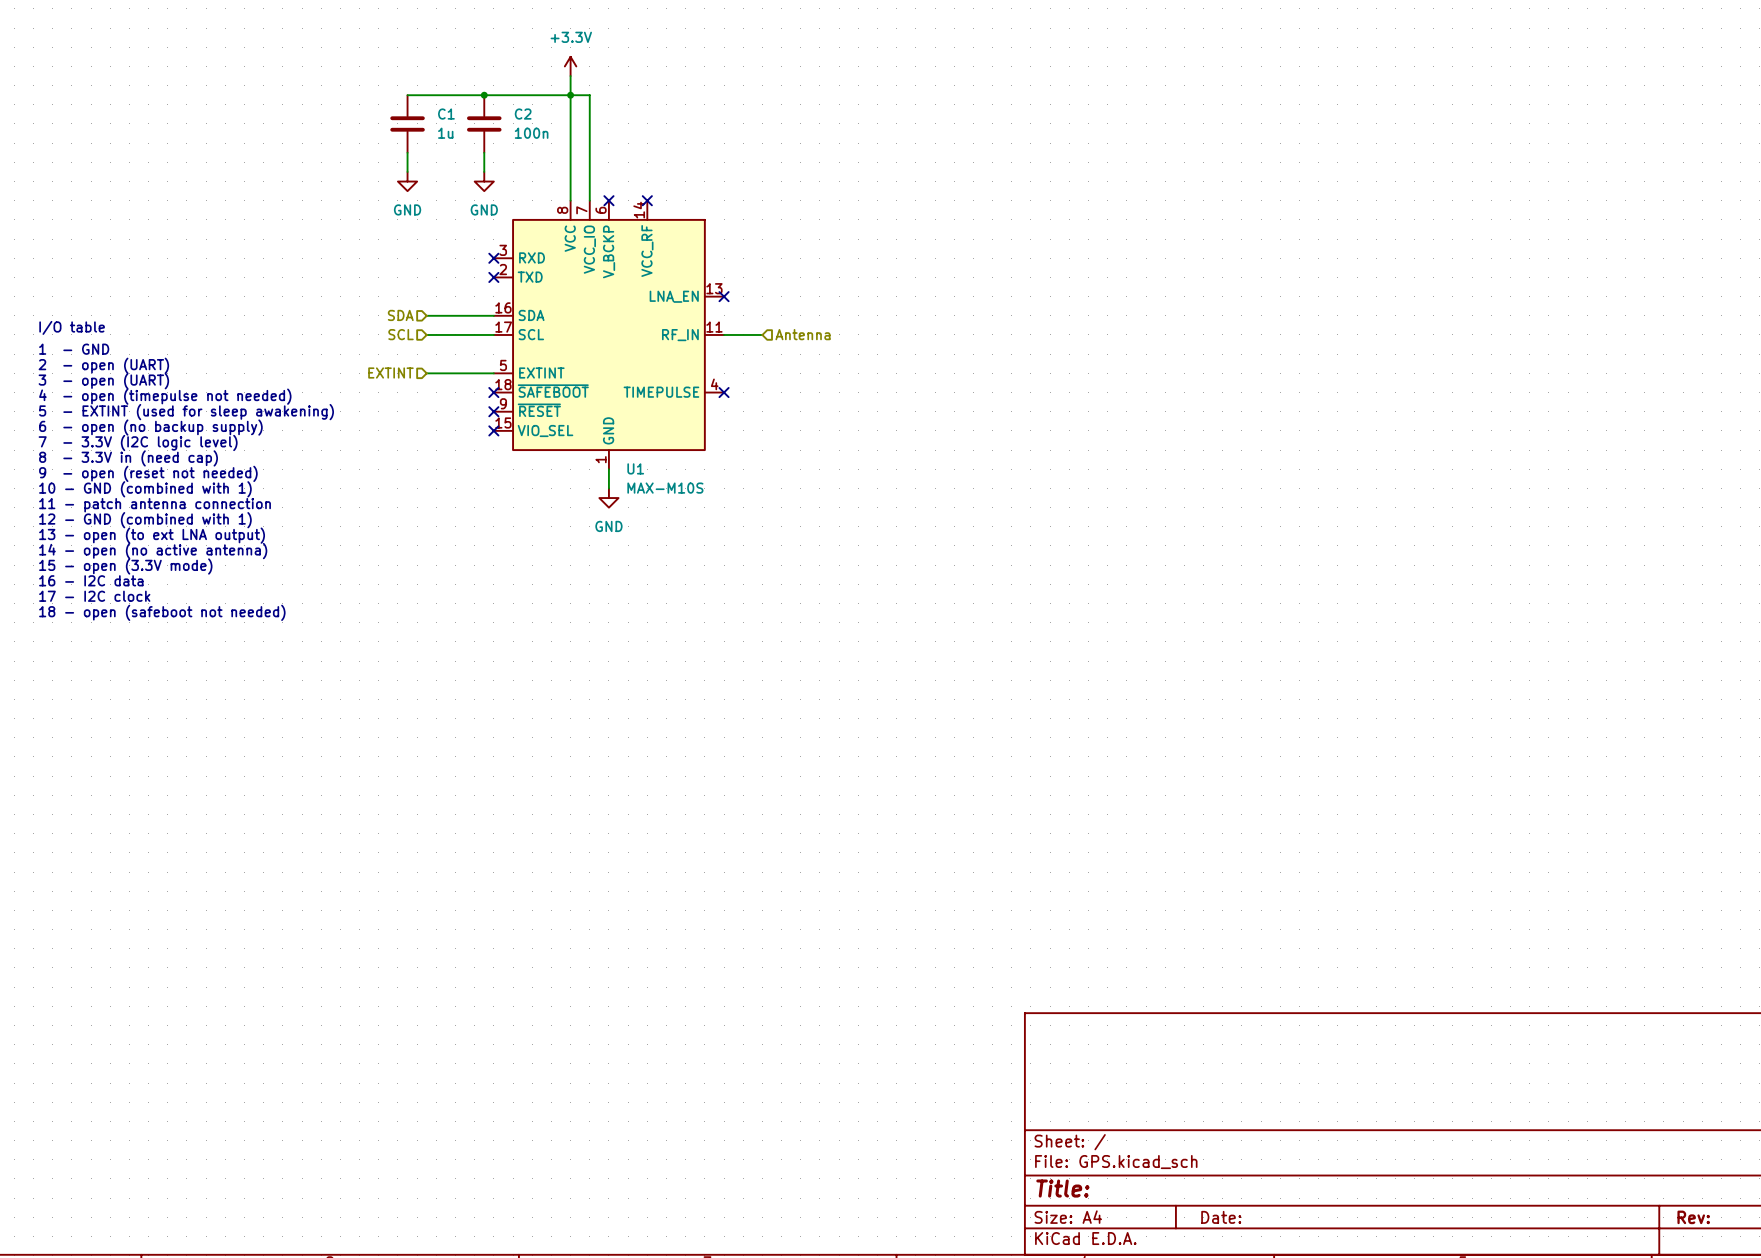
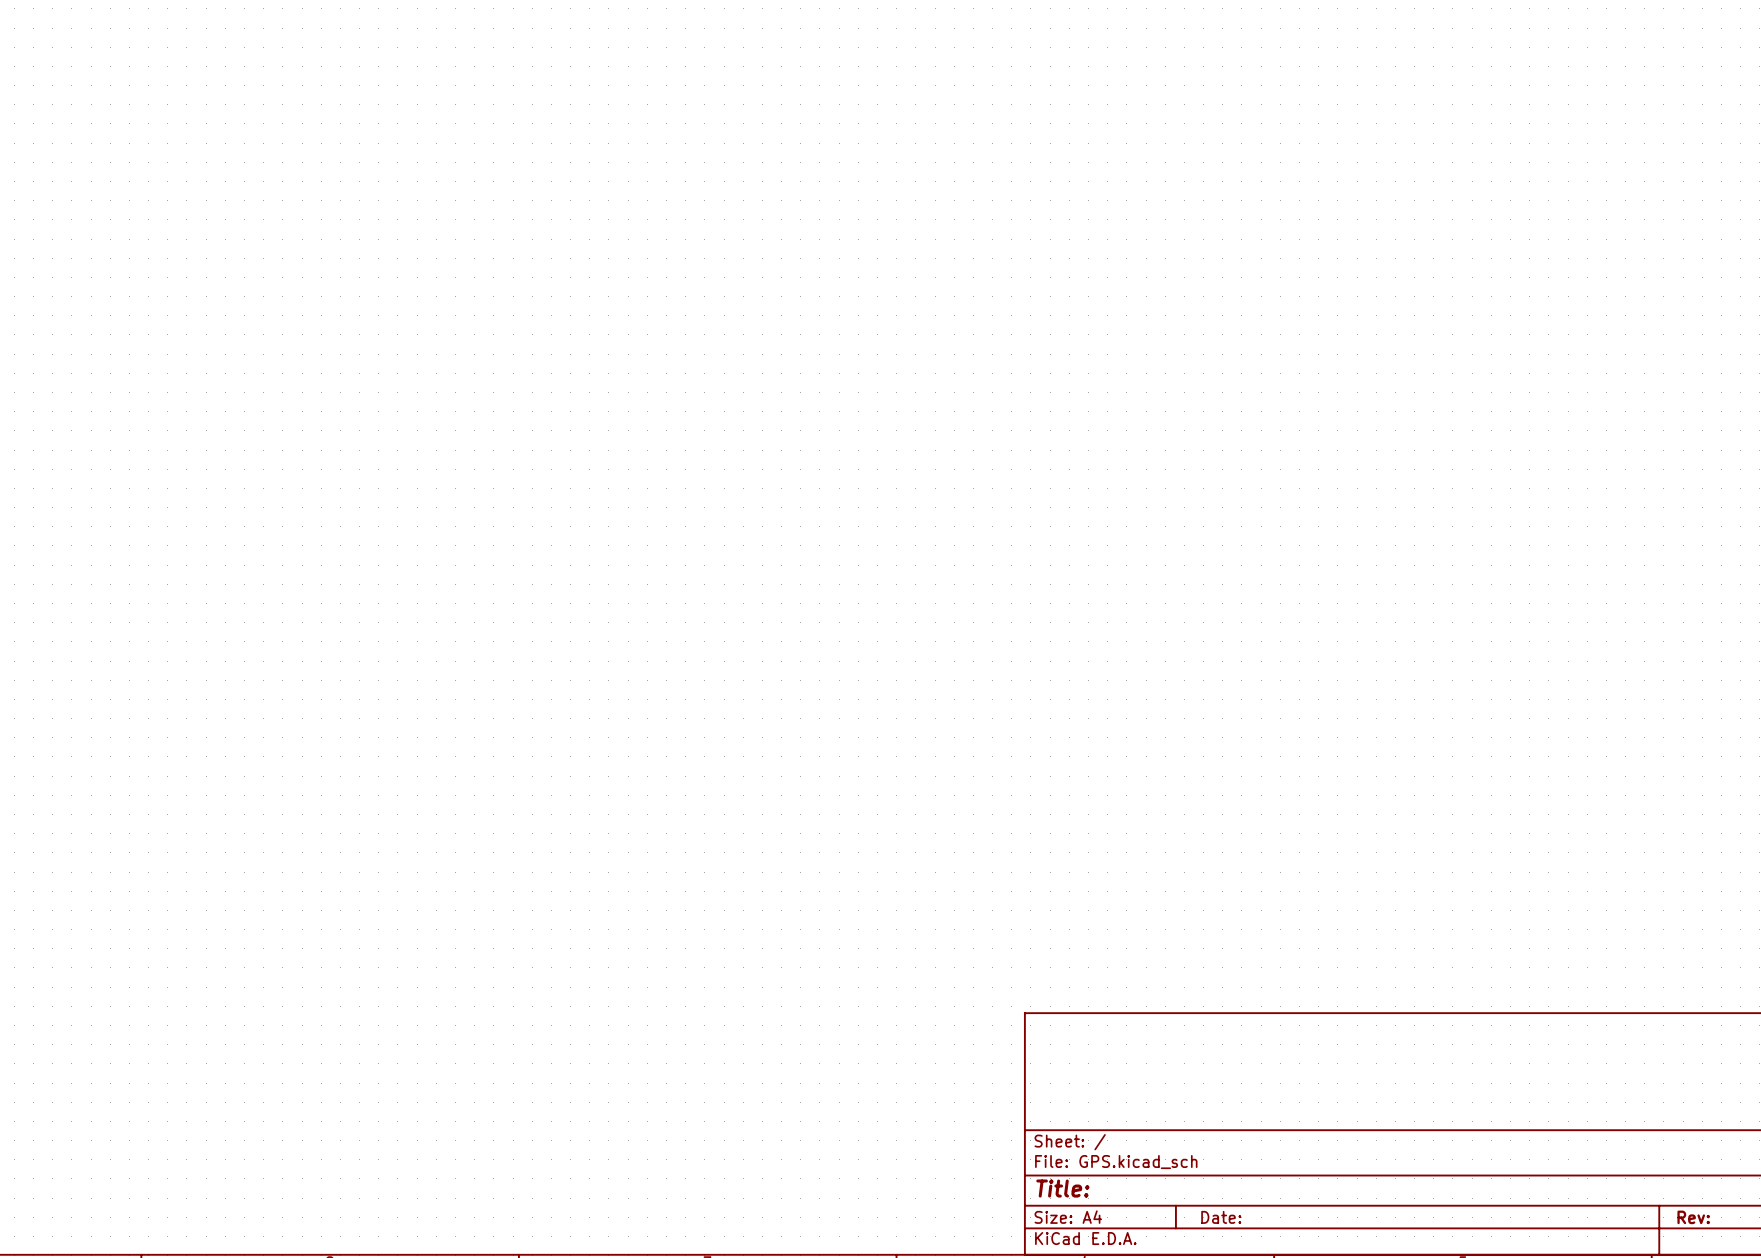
power symbol: +3.3V (570, 66) -> none
wire: (570, 76) (570, 200) -> none
wire: (407, 95) (589, 95) (589, 200) -> none
junction: (484, 95) -> none
junction: (570, 95) -> none
C1: 1u (407, 123) -> none
C2: 100n (484, 123) -> none
wire: (407, 152) (407, 171) -> none
wire: (484, 152) (484, 171) -> none
power symbol: GND (407, 181) -> none
power symbol: GND (484, 181) -> none
no-connect mark: (608, 200) -> none
no-connect mark: (647, 200) -> none
no-connect mark: (493, 258) -> none
no-connect mark: (493, 277) -> none
no-connect mark: (724, 296) -> none
hierarchical label: SDA (400, 315) -> none
wire: (426, 315) (493, 315) -> none
text: I/O table (72, 327) -> none
hierarchical label: SCL (401, 334) -> none
wire: (426, 334) (493, 334) -> none
U1: MAX-M10S (608, 334) -> none
wire: (724, 334) (762, 334) -> none
hierarchical label: Antenna (802, 334) -> none
text: 1 - GND (74, 349) -> none
text: 2 - open (UART) (103, 365) -> none
hierarchical label: EXTINT (390, 372) -> none
wire: (426, 373) (493, 373) -> none
text: 3 - open (UART) (103, 381) -> none
no-connect mark: (493, 392) -> none
no-connect mark: (724, 392) -> none
text: 4 - open (timepulse not needed) (165, 396) -> none
no-connect mark: (493, 411) -> none
text: 5 - EXTINT (used for sleep awakening) (186, 412) -> none
text: 6 - open (no backup supply) (150, 427) -> none
no-connect mark: (493, 430) -> none
text: 7 - 3.3V (I2C logic level) (138, 442) -> none
text: 8 - 3.3V in (need cap) (128, 458) -> none
wire: (608, 469) (608, 488) -> none
text: 9 - open (reset not needed) (148, 473) -> none
text: 10 - GND (combined with 1) (145, 489) -> none
power symbol: GND (608, 498) -> none
text: 11 - patch antenna connection (155, 505) -> none
text: 12 - GND (combined with 1) (145, 520) -> none
text: 13 - open (to ext LNA output) (152, 535) -> none
text: 14 - open (no active antenna) (153, 551) -> none
text: 15 - open (3.3V mode) (125, 566) -> none
text: 16 - I2C data (91, 580) -> none
text: 17 - I2C clock (94, 596) -> none
text: 18 - open (safeboot not needed) (162, 612) -> none

